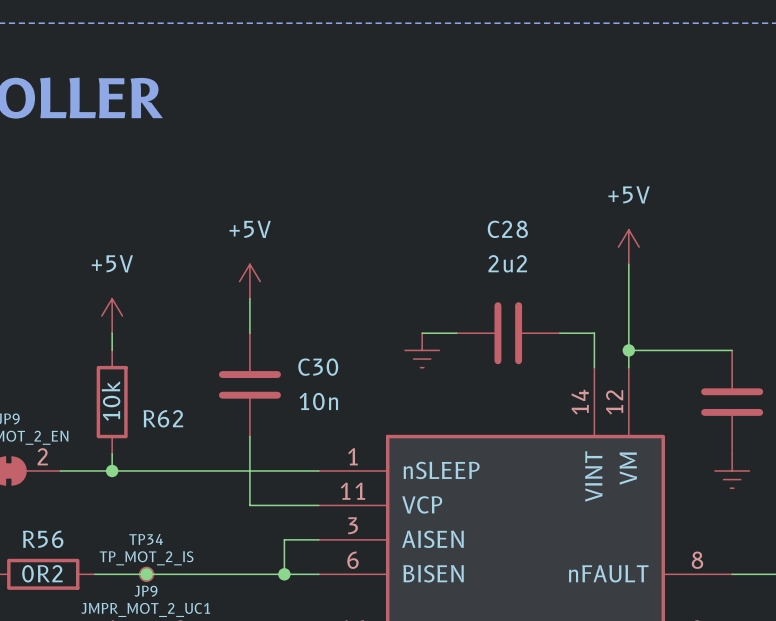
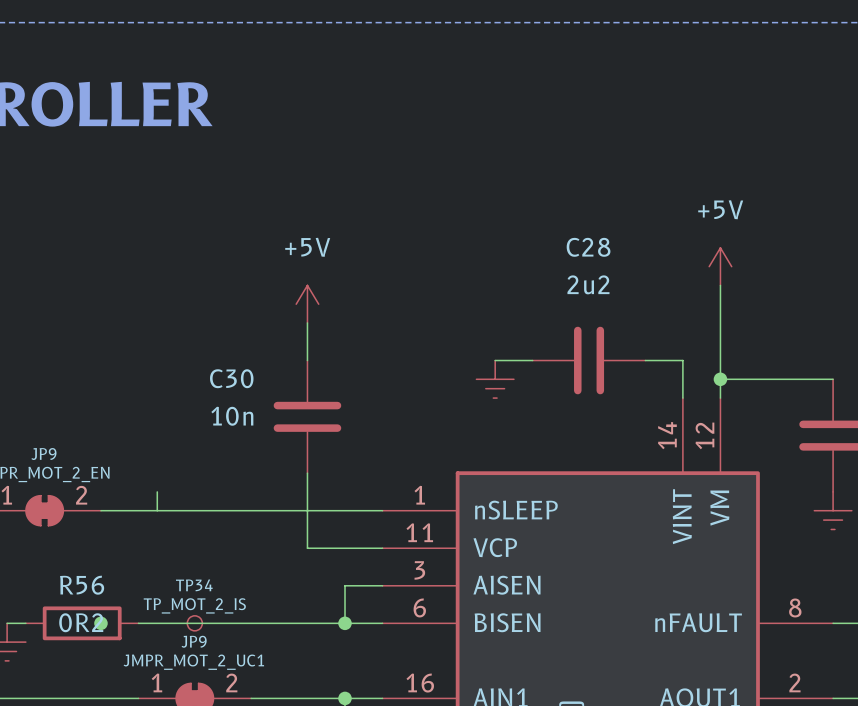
power symbol: +5V (112, 315) -> none
wire: (112, 333) (112, 350) -> none
C30 name position: C30 (318, 367) -> C30 (231, 378)
C30 value position: 10n (318, 401) -> 10n (232, 416)
R62: 10k (112, 402) -> none
junction: (112, 470) -> none
junction: none -> (100, 623)
junction: (146, 574) -> none

